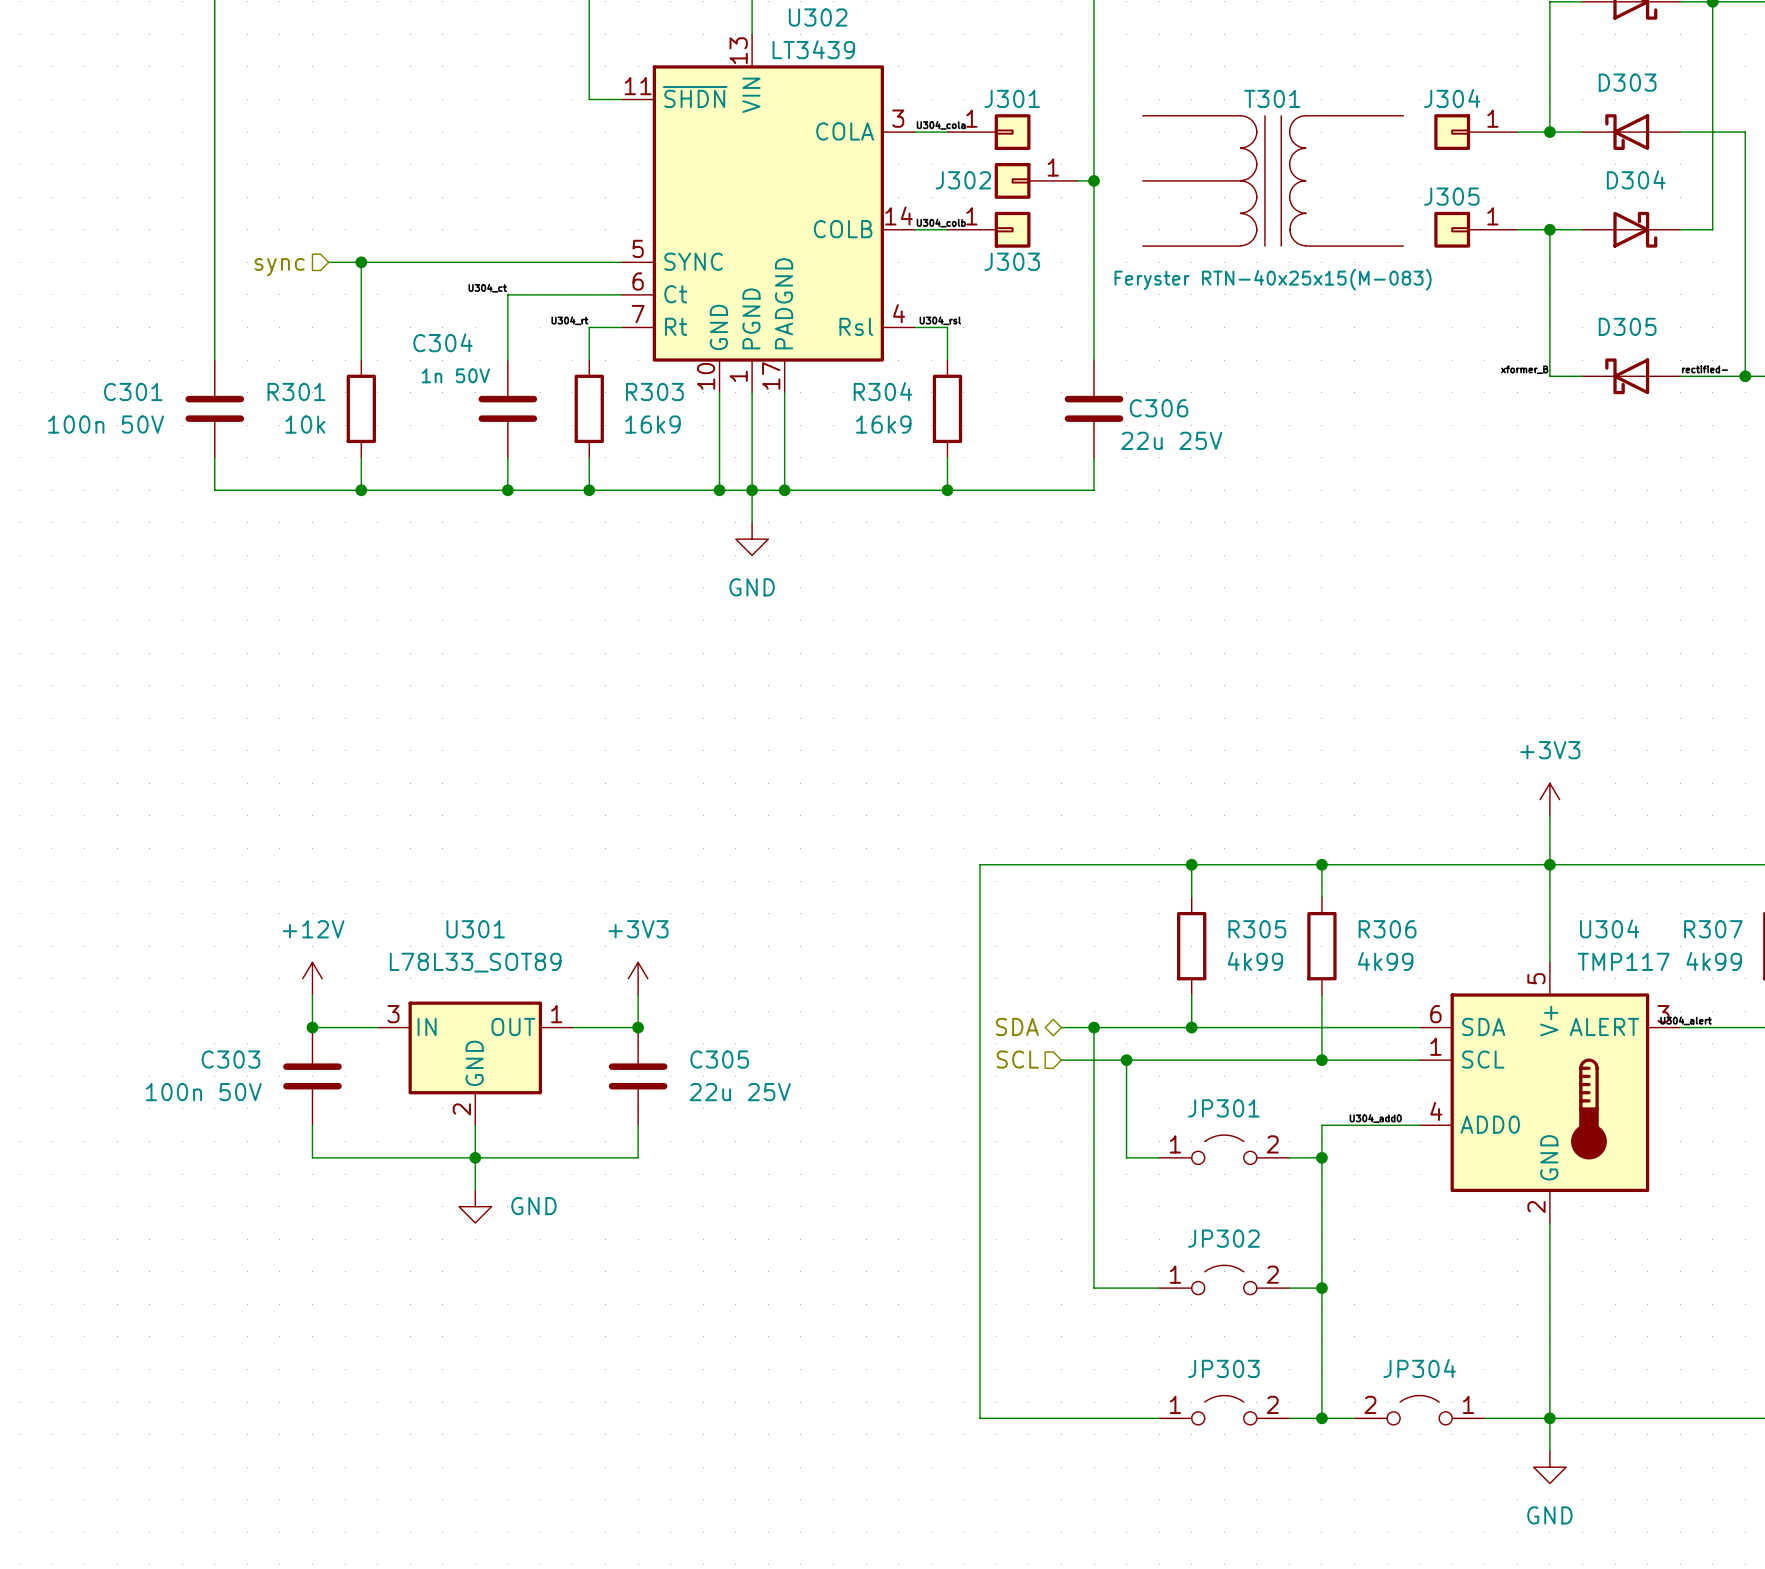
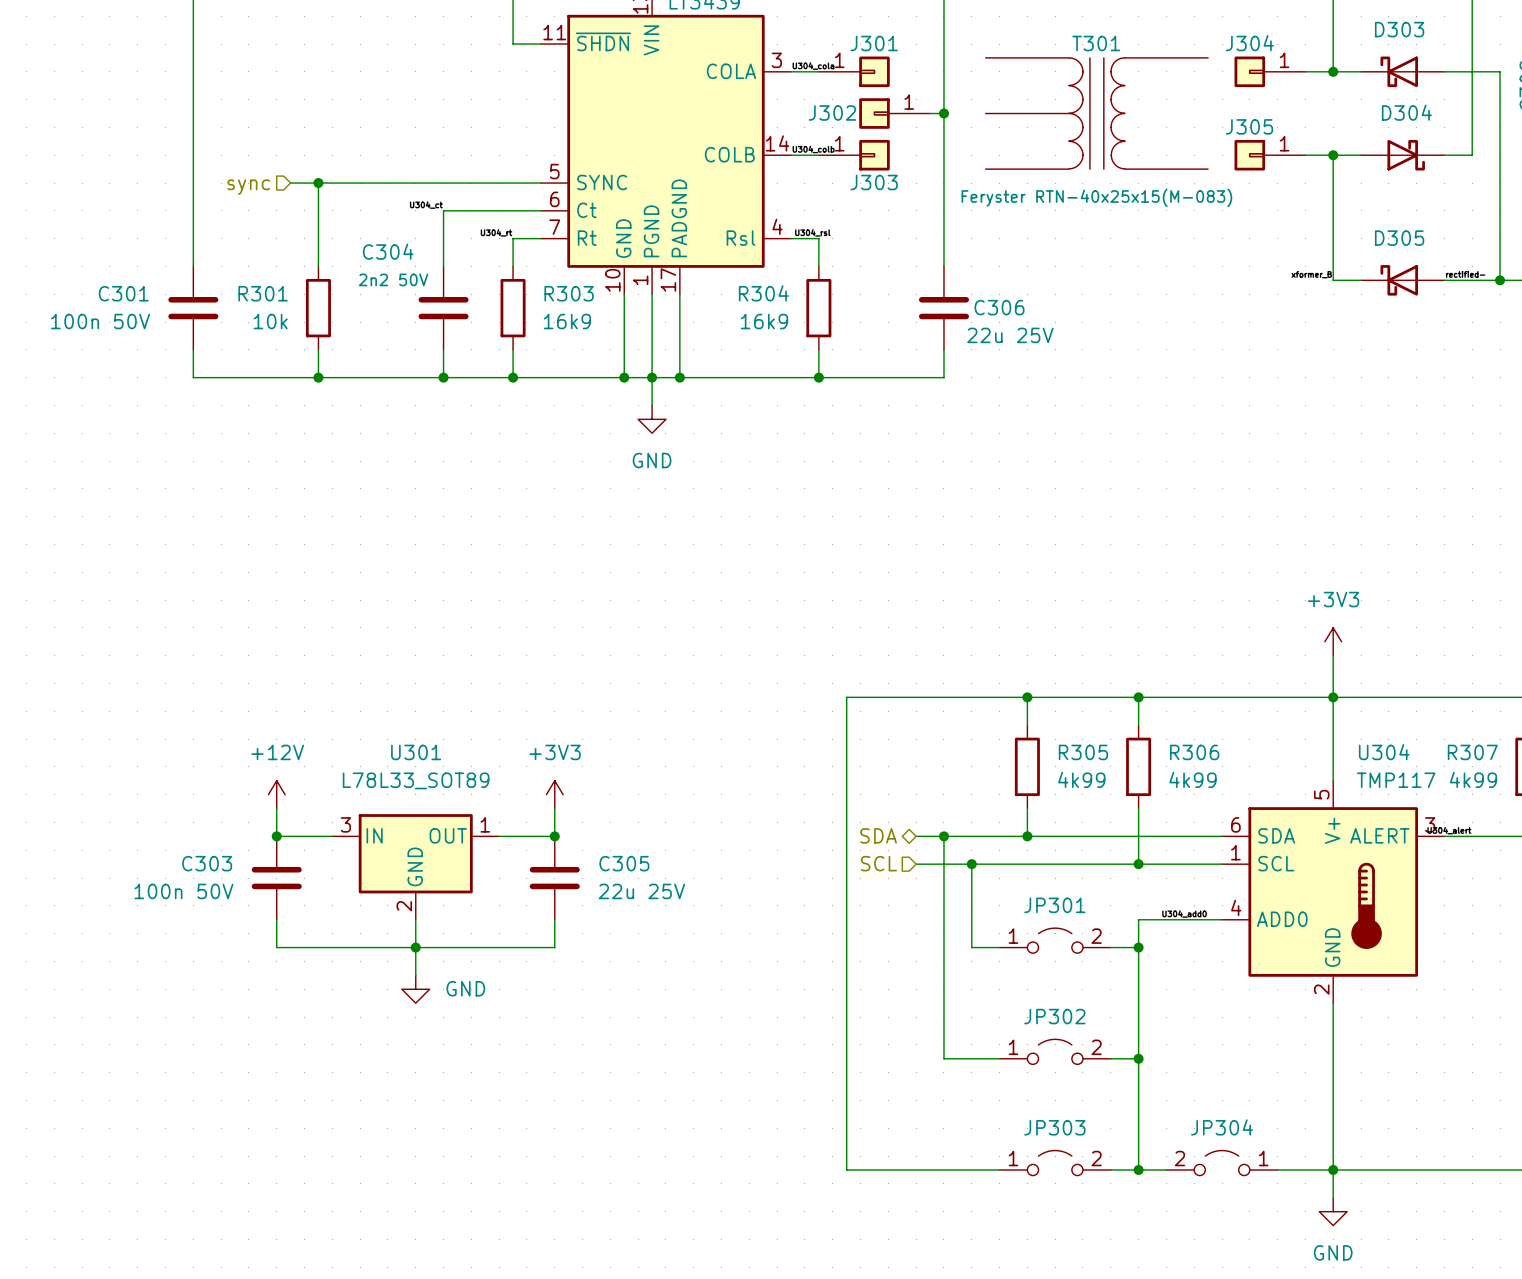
C304 value: 1n 50V (455, 375) -> 2n2 50V (393, 279)

